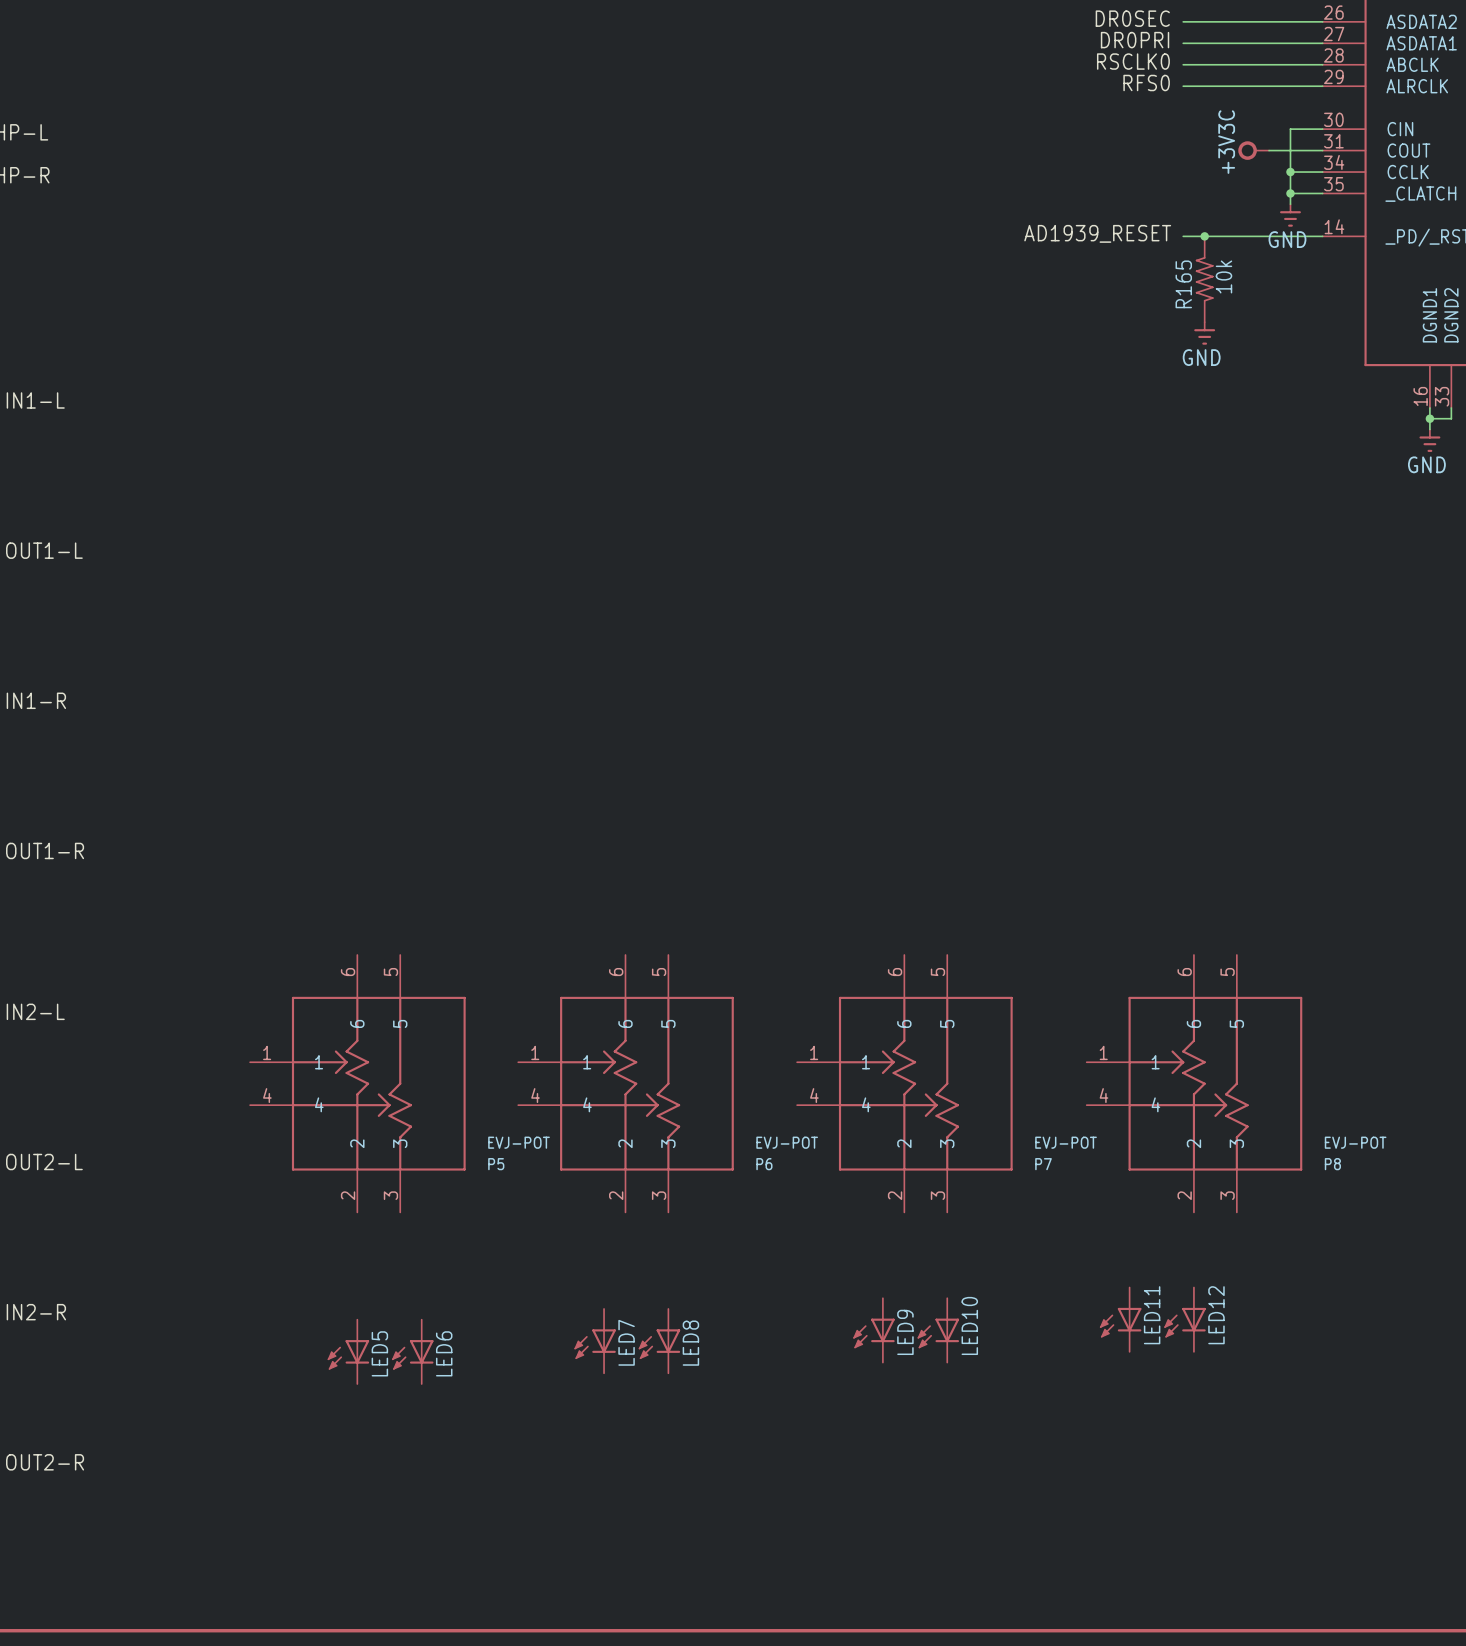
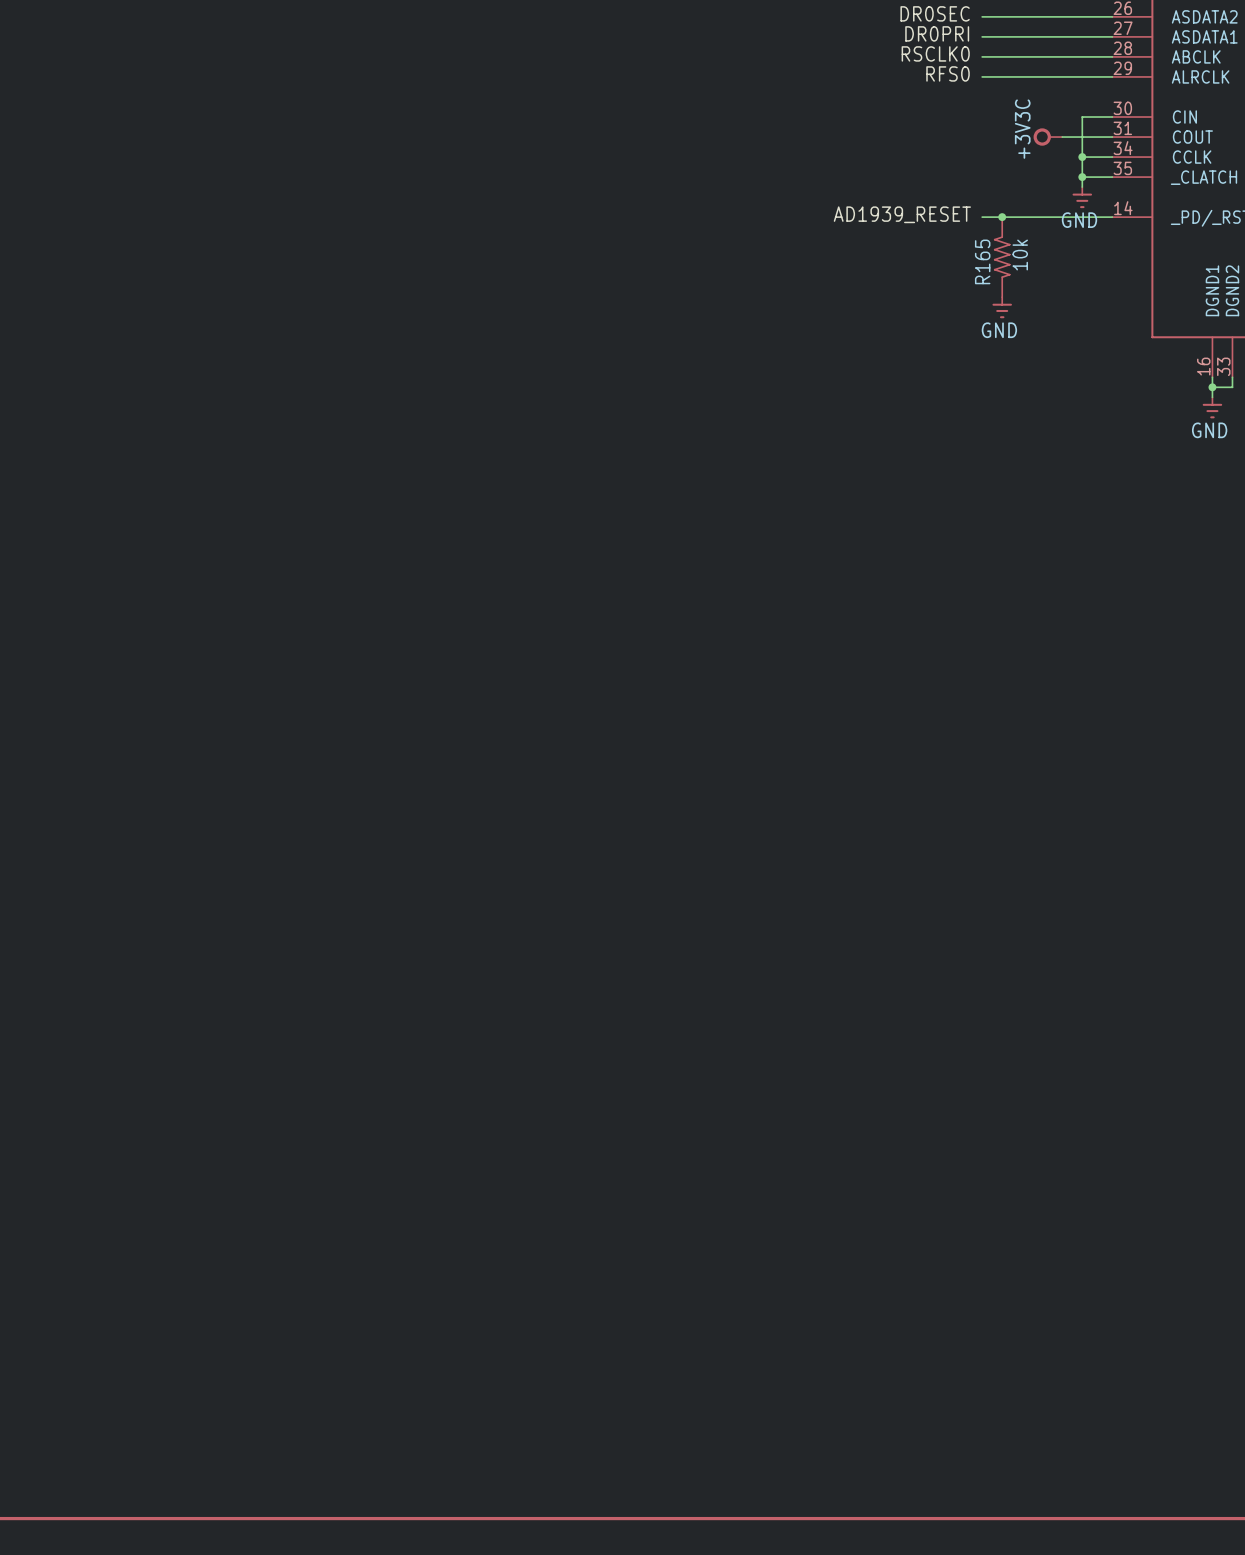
P5: EVJ-POT (357, 1083) -> none
P6: EVJ-POT (626, 1083) -> none
P7: EVJ-POT (904, 1083) -> none
P8: EVJ-POT (1194, 1083) -> none
LED11: (1120, 1319) -> none
LED12: (1185, 1319) -> none
LED9: (874, 1330) -> none
LED10: (938, 1330) -> none
LED7: (595, 1341) -> none
LED8: (659, 1341) -> none
LED5: (348, 1351) -> none
LED6: (412, 1351) -> none

